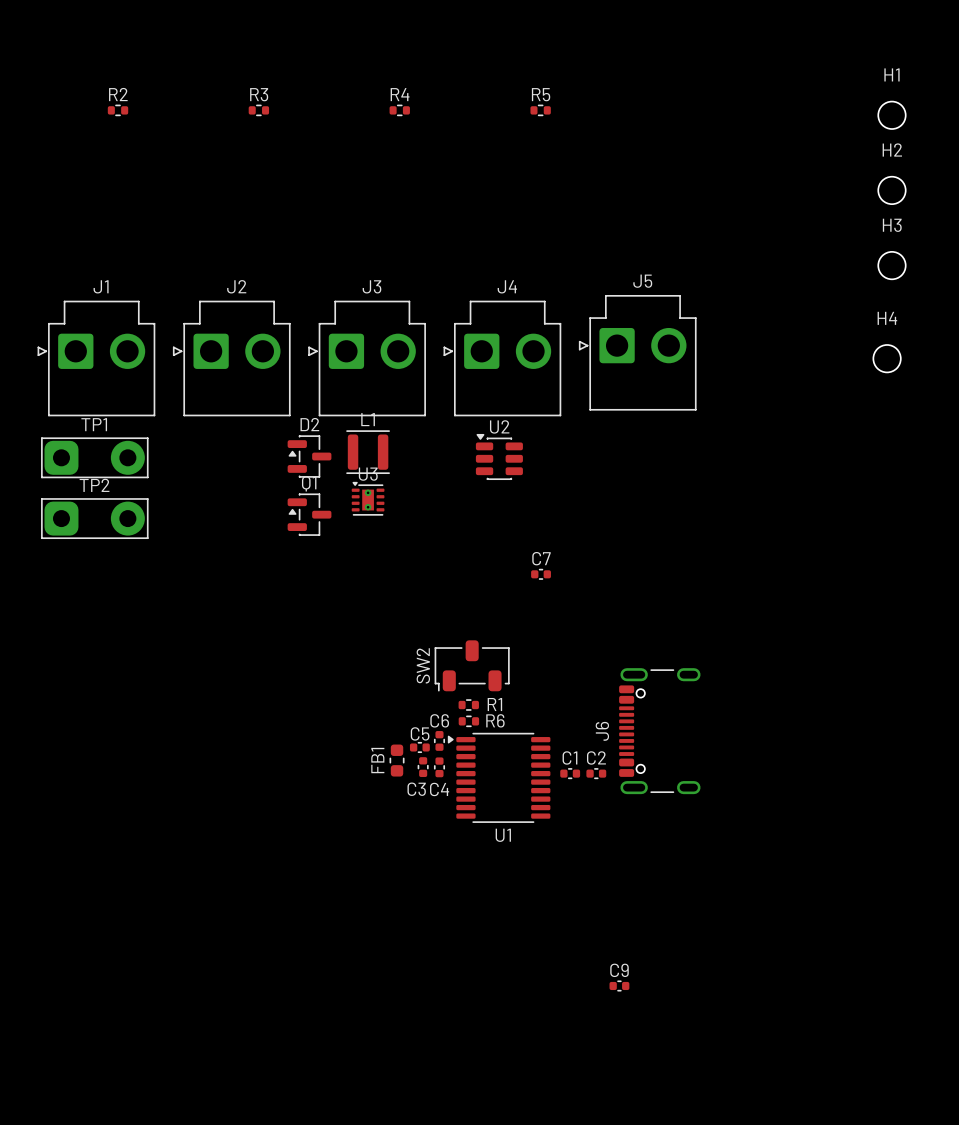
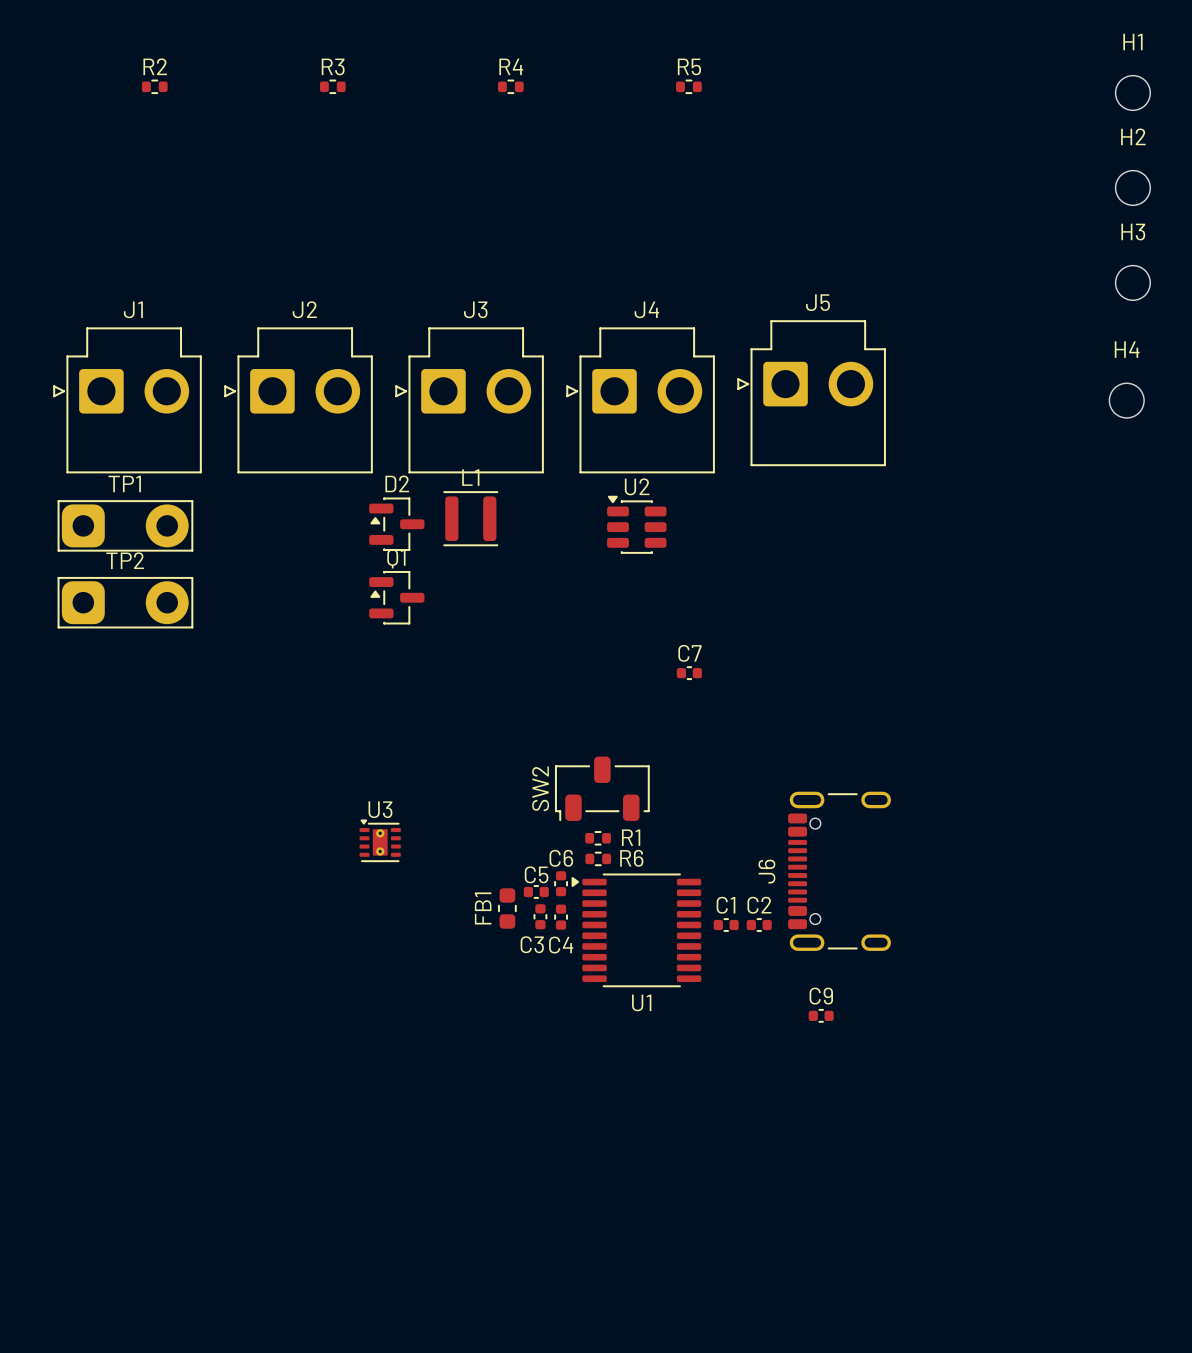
U3 position: (368, 498) -> (380, 840)
C9 position: (619, 985) -> (821, 1015)

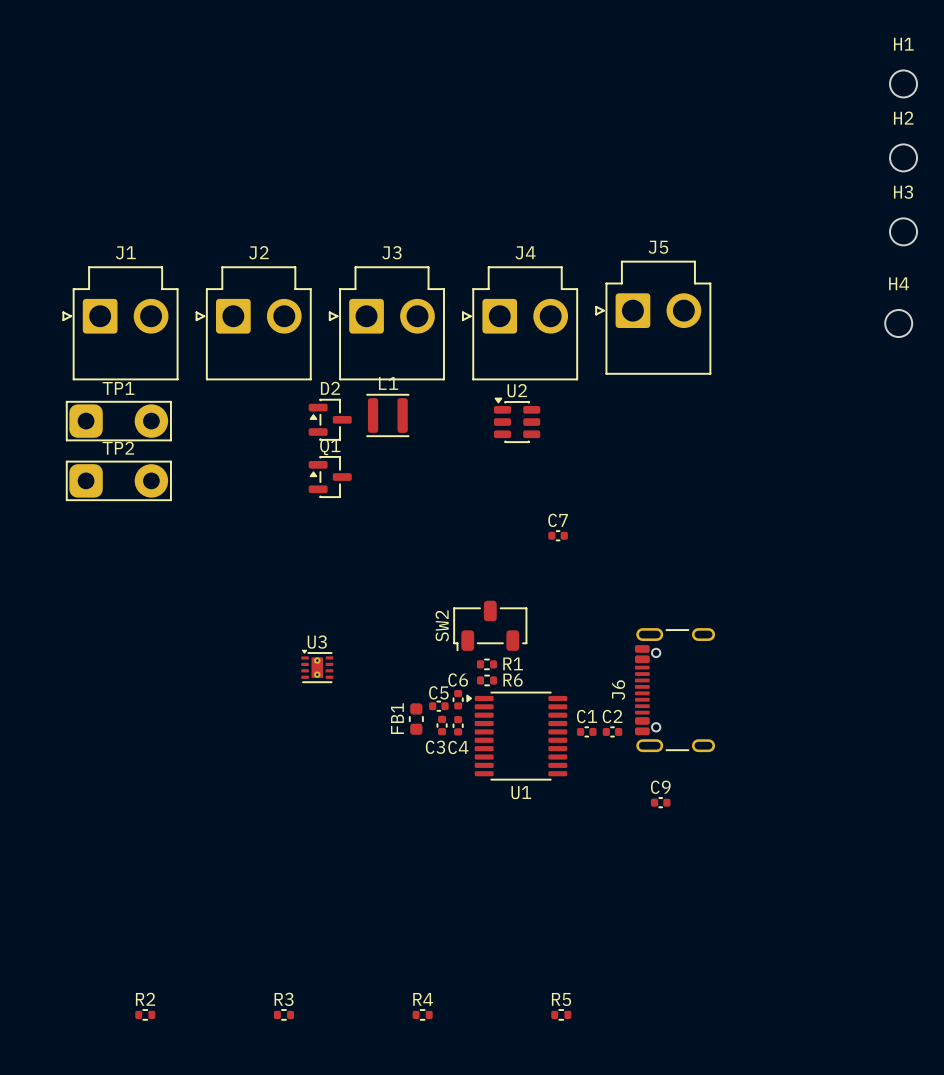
R2 position: (154, 86) -> (145, 1014)
R3 position: (332, 86) -> (283, 1014)
R4 position: (510, 86) -> (422, 1014)
R5 position: (688, 86) -> (561, 1014)

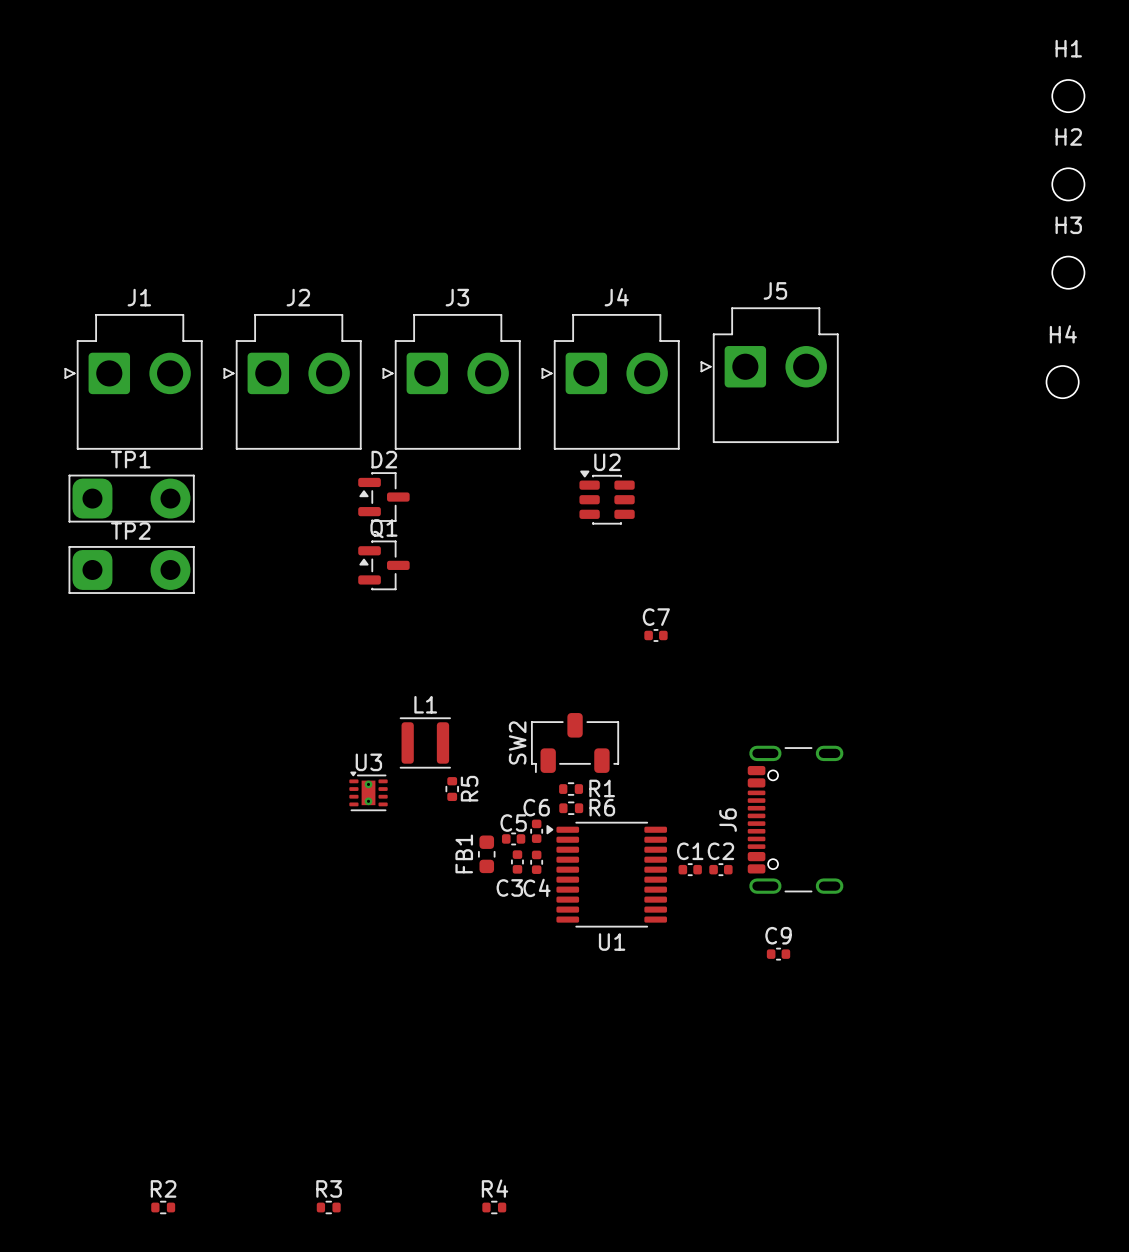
L1 position: (387, 415) -> (425, 742)
R5 rotation: 0° (561, 1014) -> 90° clockwise (452, 789)
R5 position: (561, 1014) -> (452, 789)

